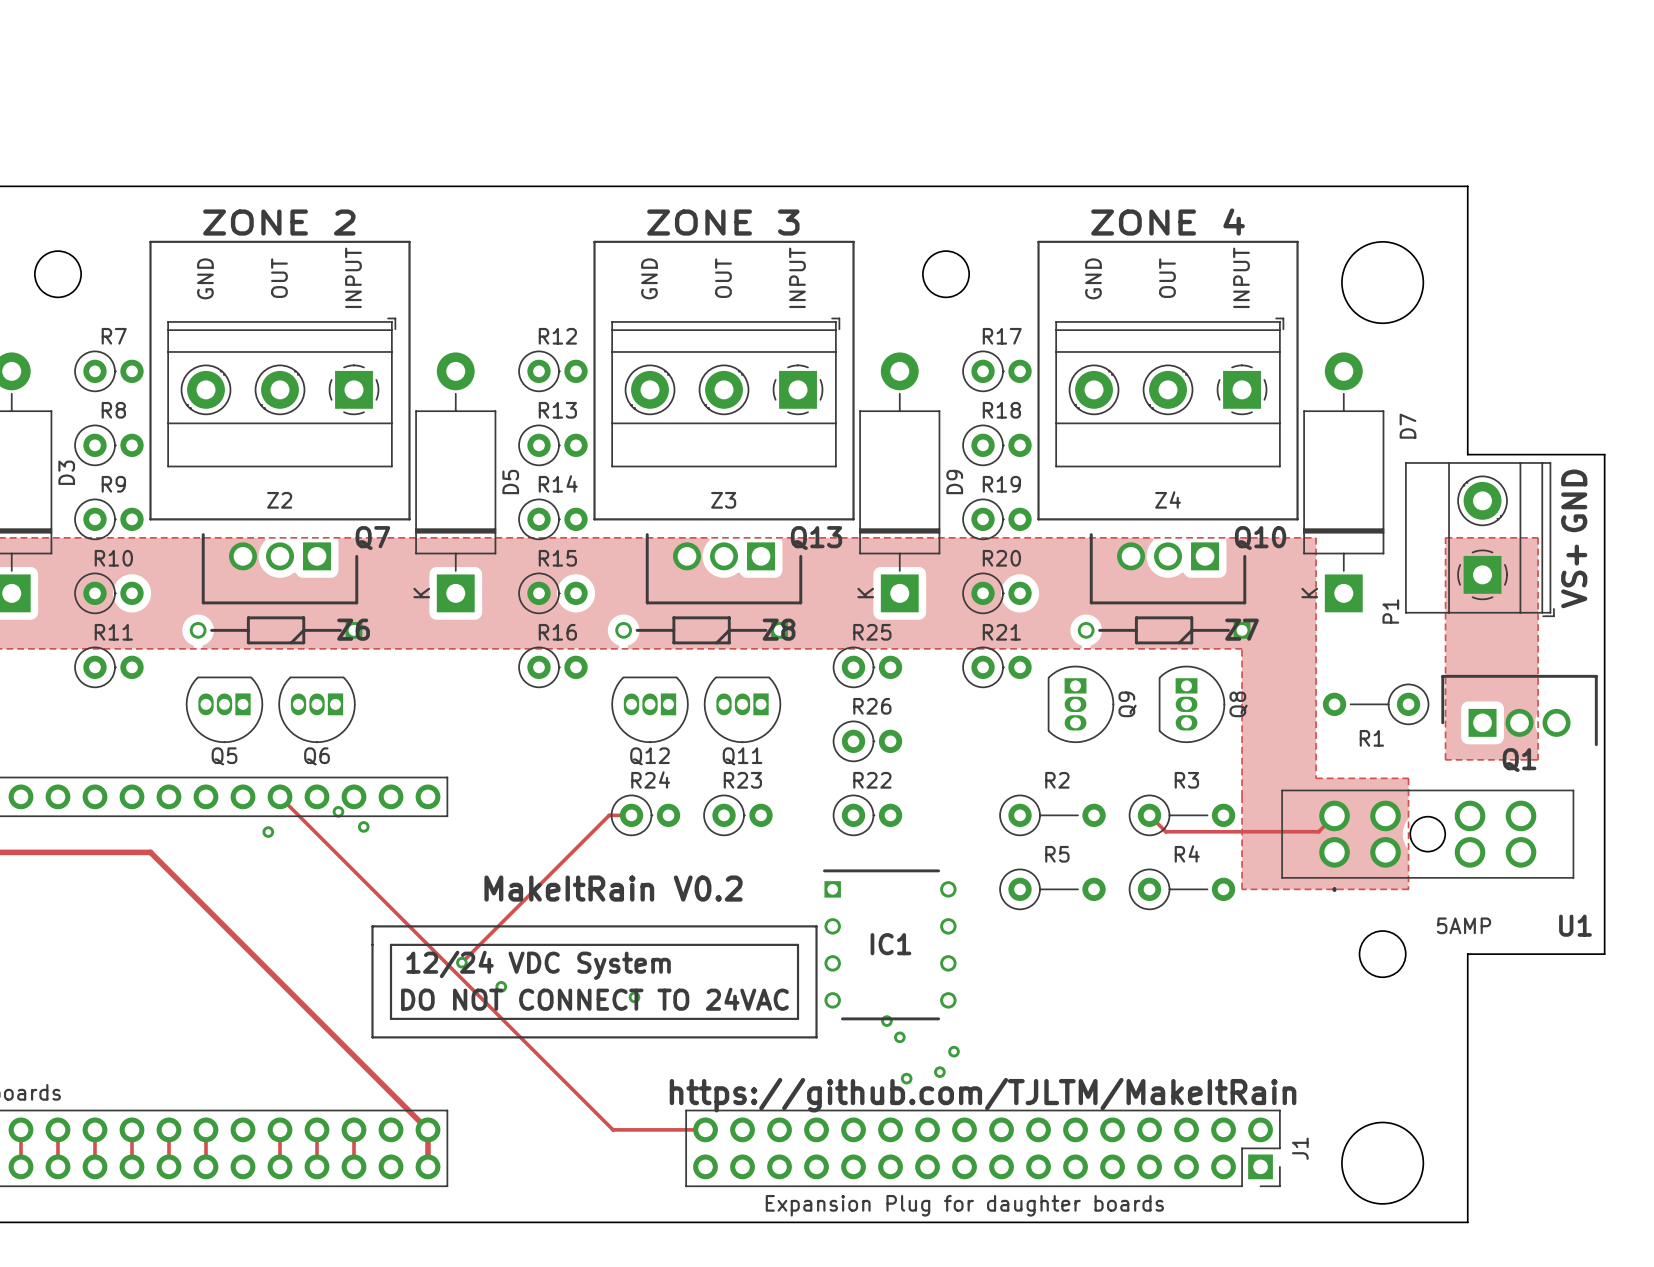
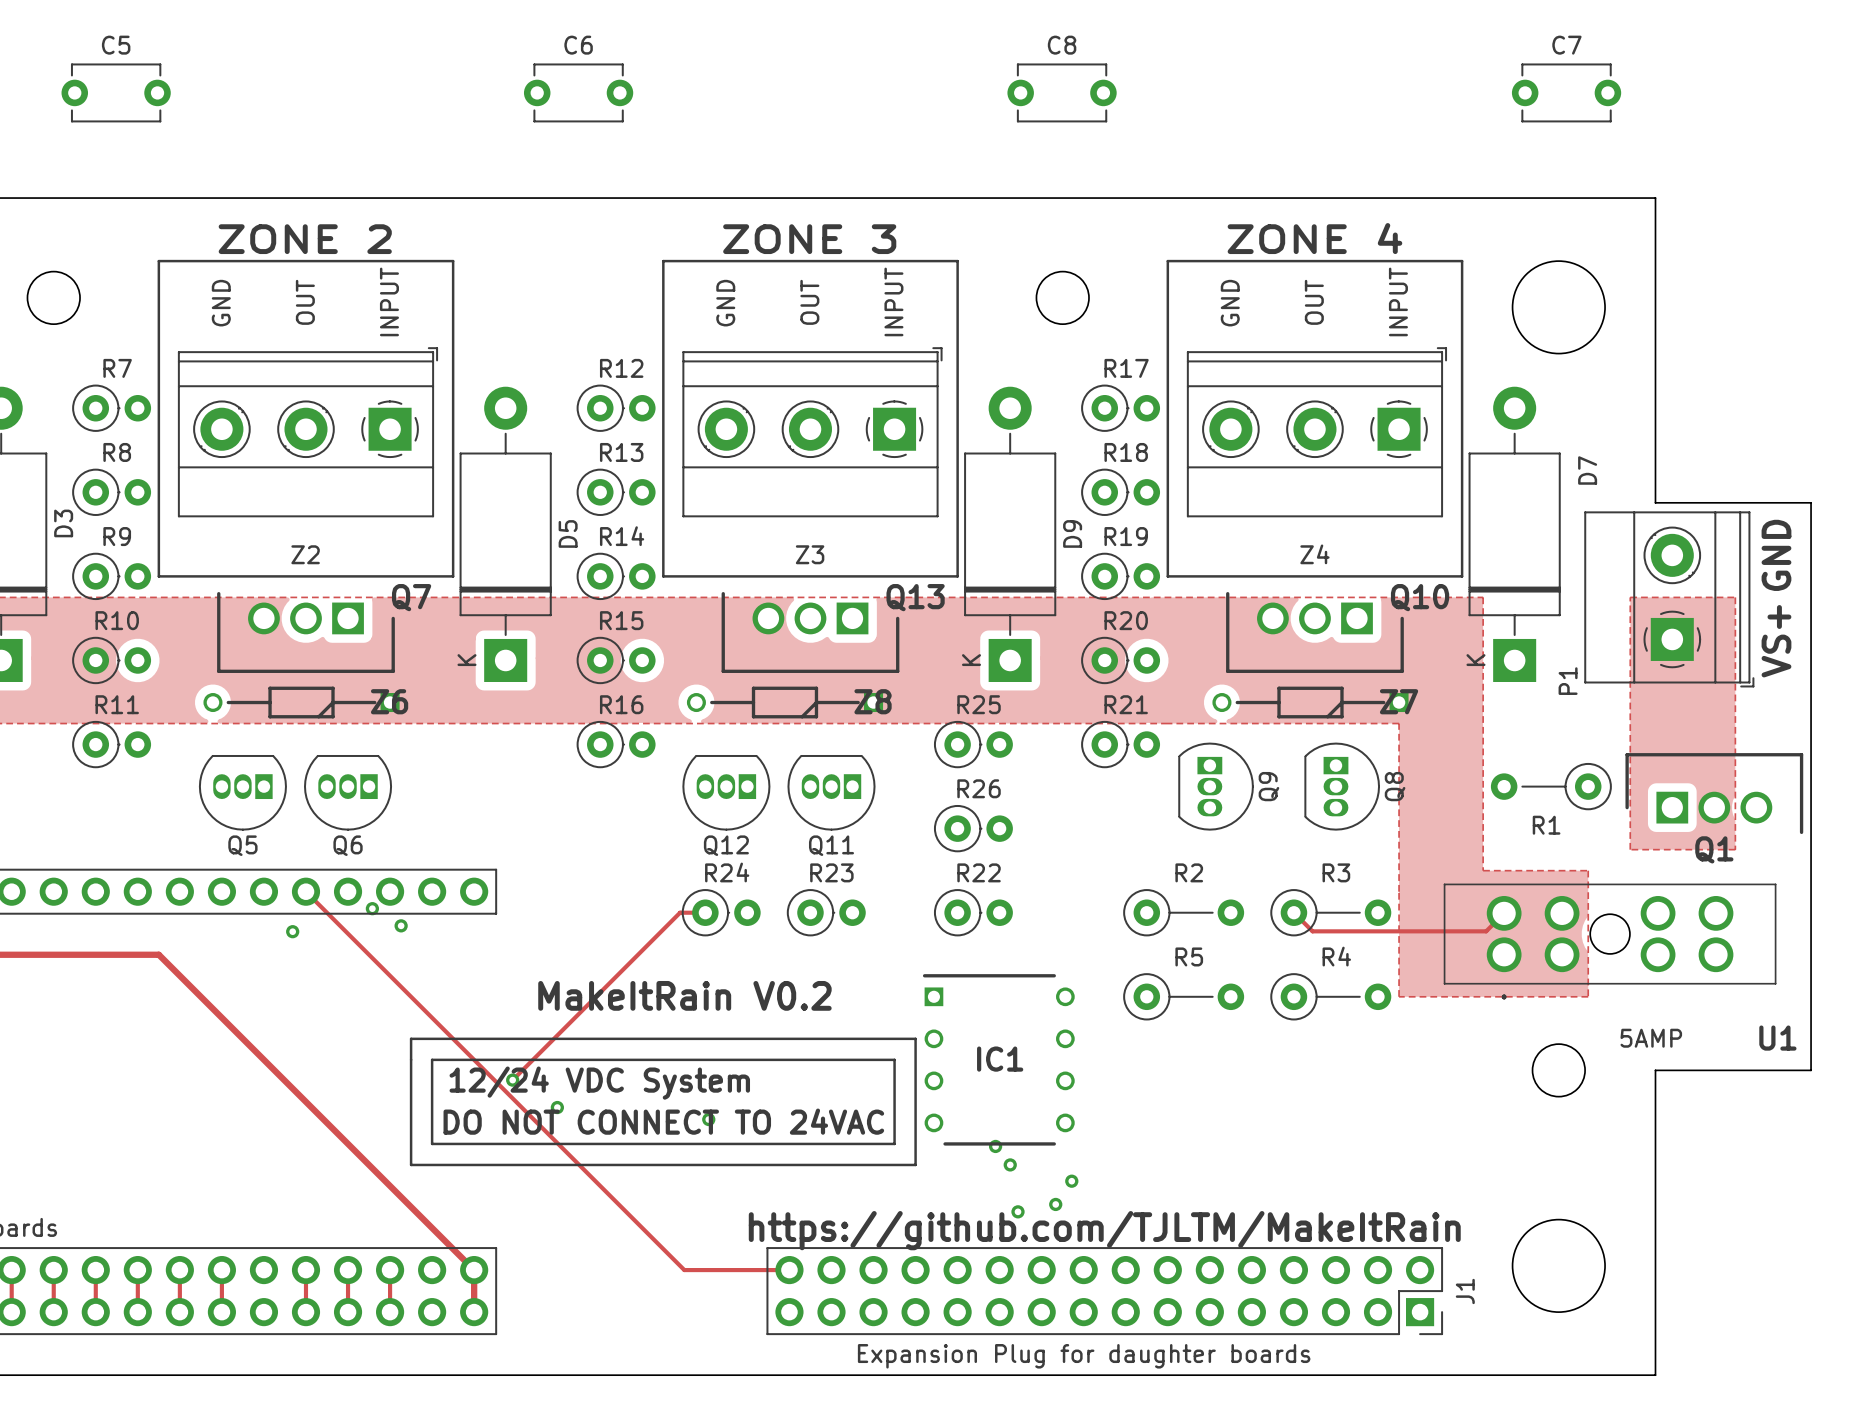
C5: none -> (116, 92)
C6: none -> (578, 92)
C8: none -> (1062, 92)
C7: none -> (1566, 92)
round board edge position: (1382, 1163) -> (1558, 1265)

